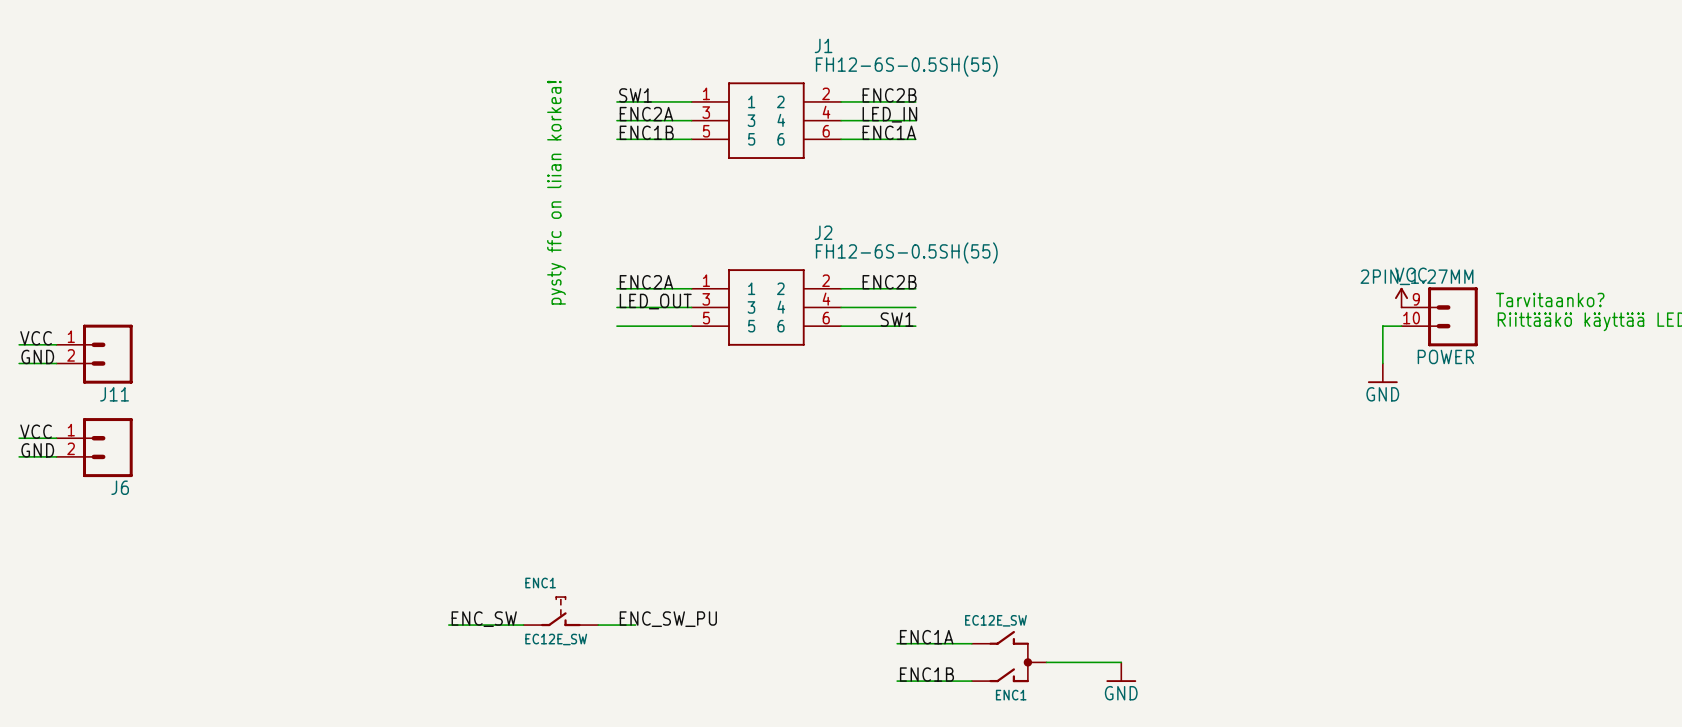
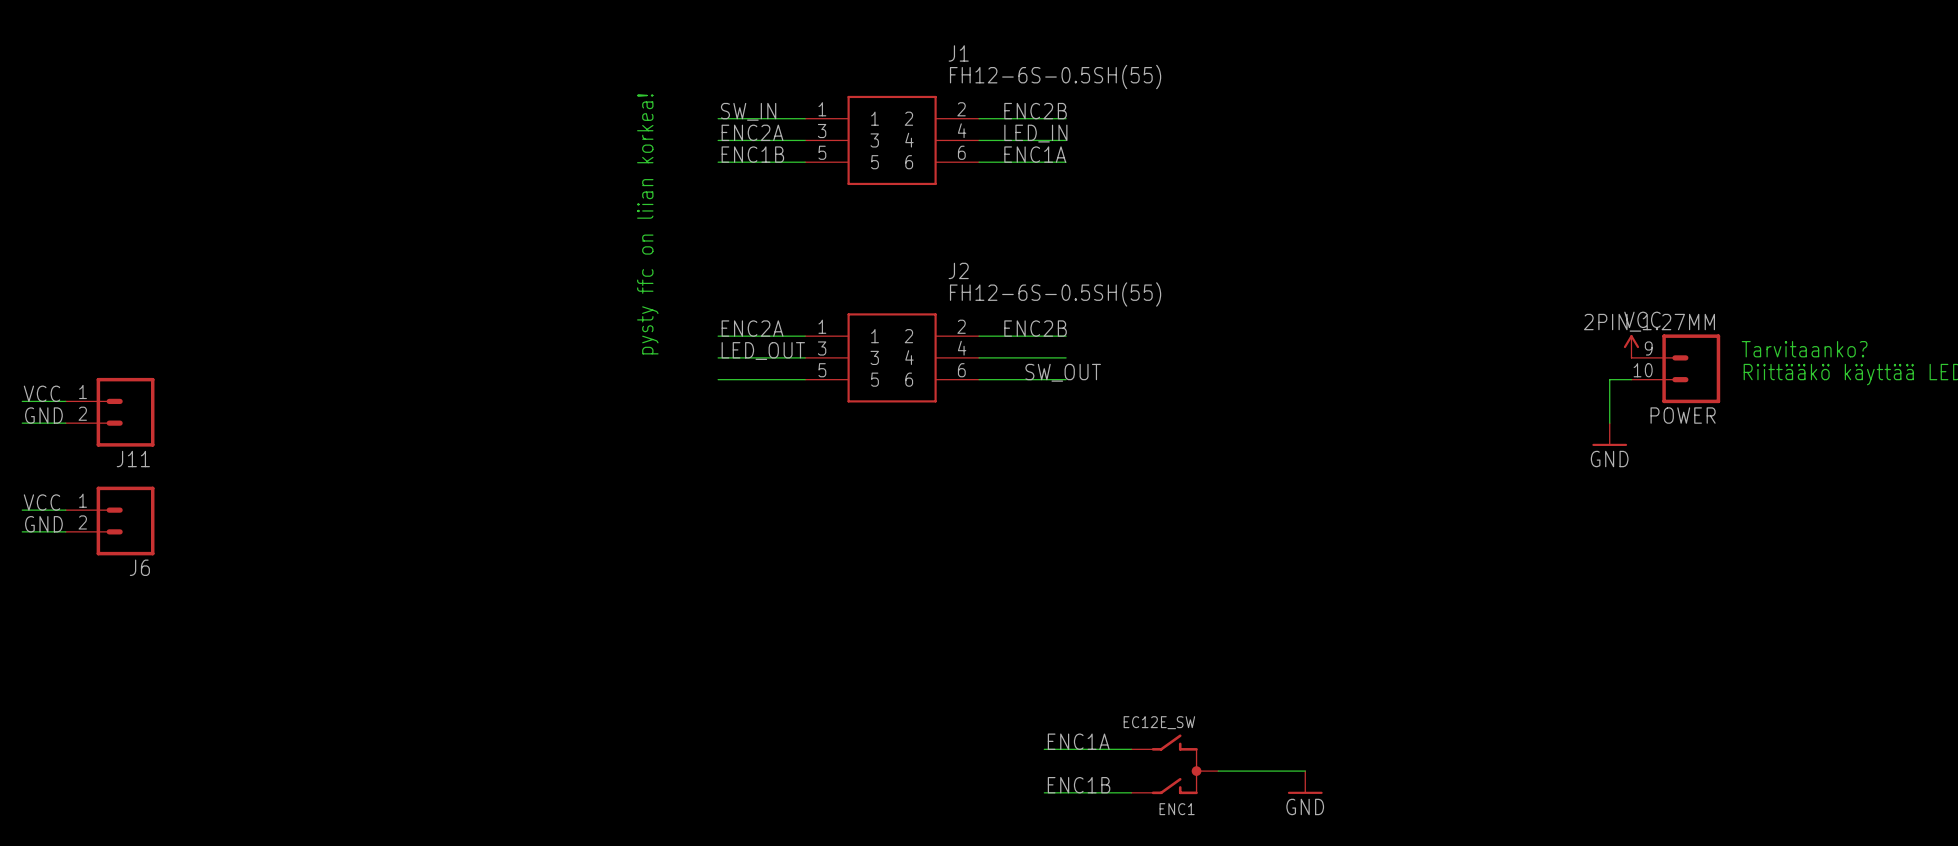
label: SW1 (635, 95) -> SW_IN (748, 111)
label: SW1 (897, 319) -> SW_OUT (1063, 372)
ENC1: EC12E_SW (560, 611) -> none
label: ENC_SW (484, 619) -> none
label: ENC_SW_PU (668, 619) -> none
wire: (448, 625) (523, 625) -> none
wire: (598, 625) (635, 625) -> none

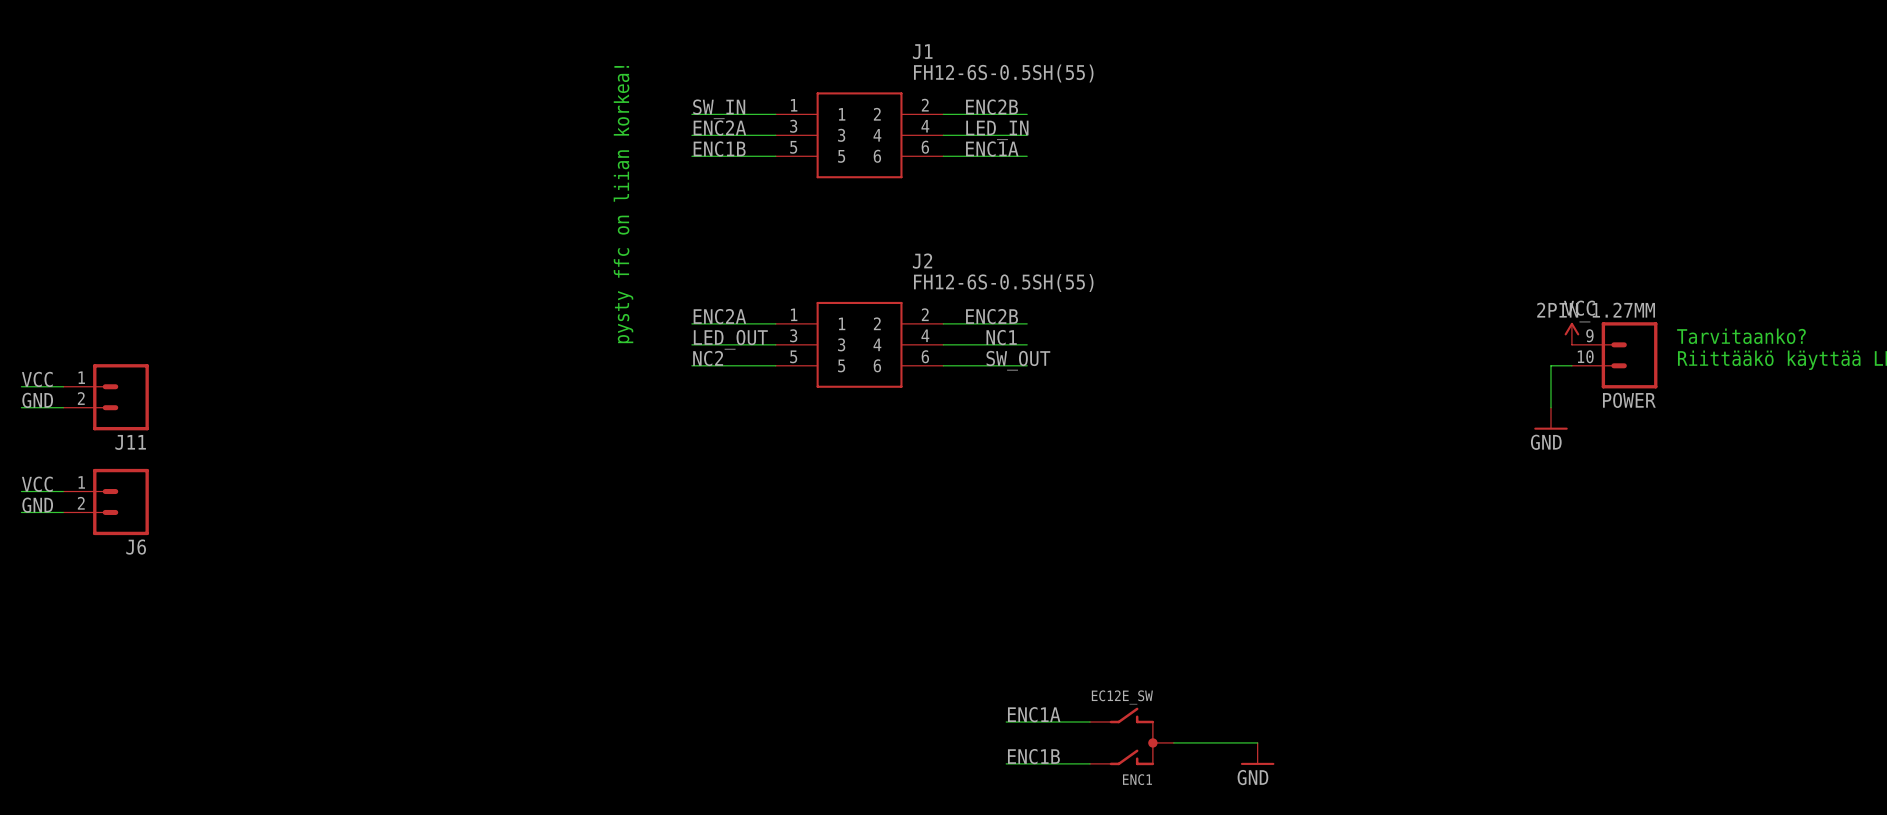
label: none -> NC1 (1001, 337)
label: none -> NC2 (708, 358)

